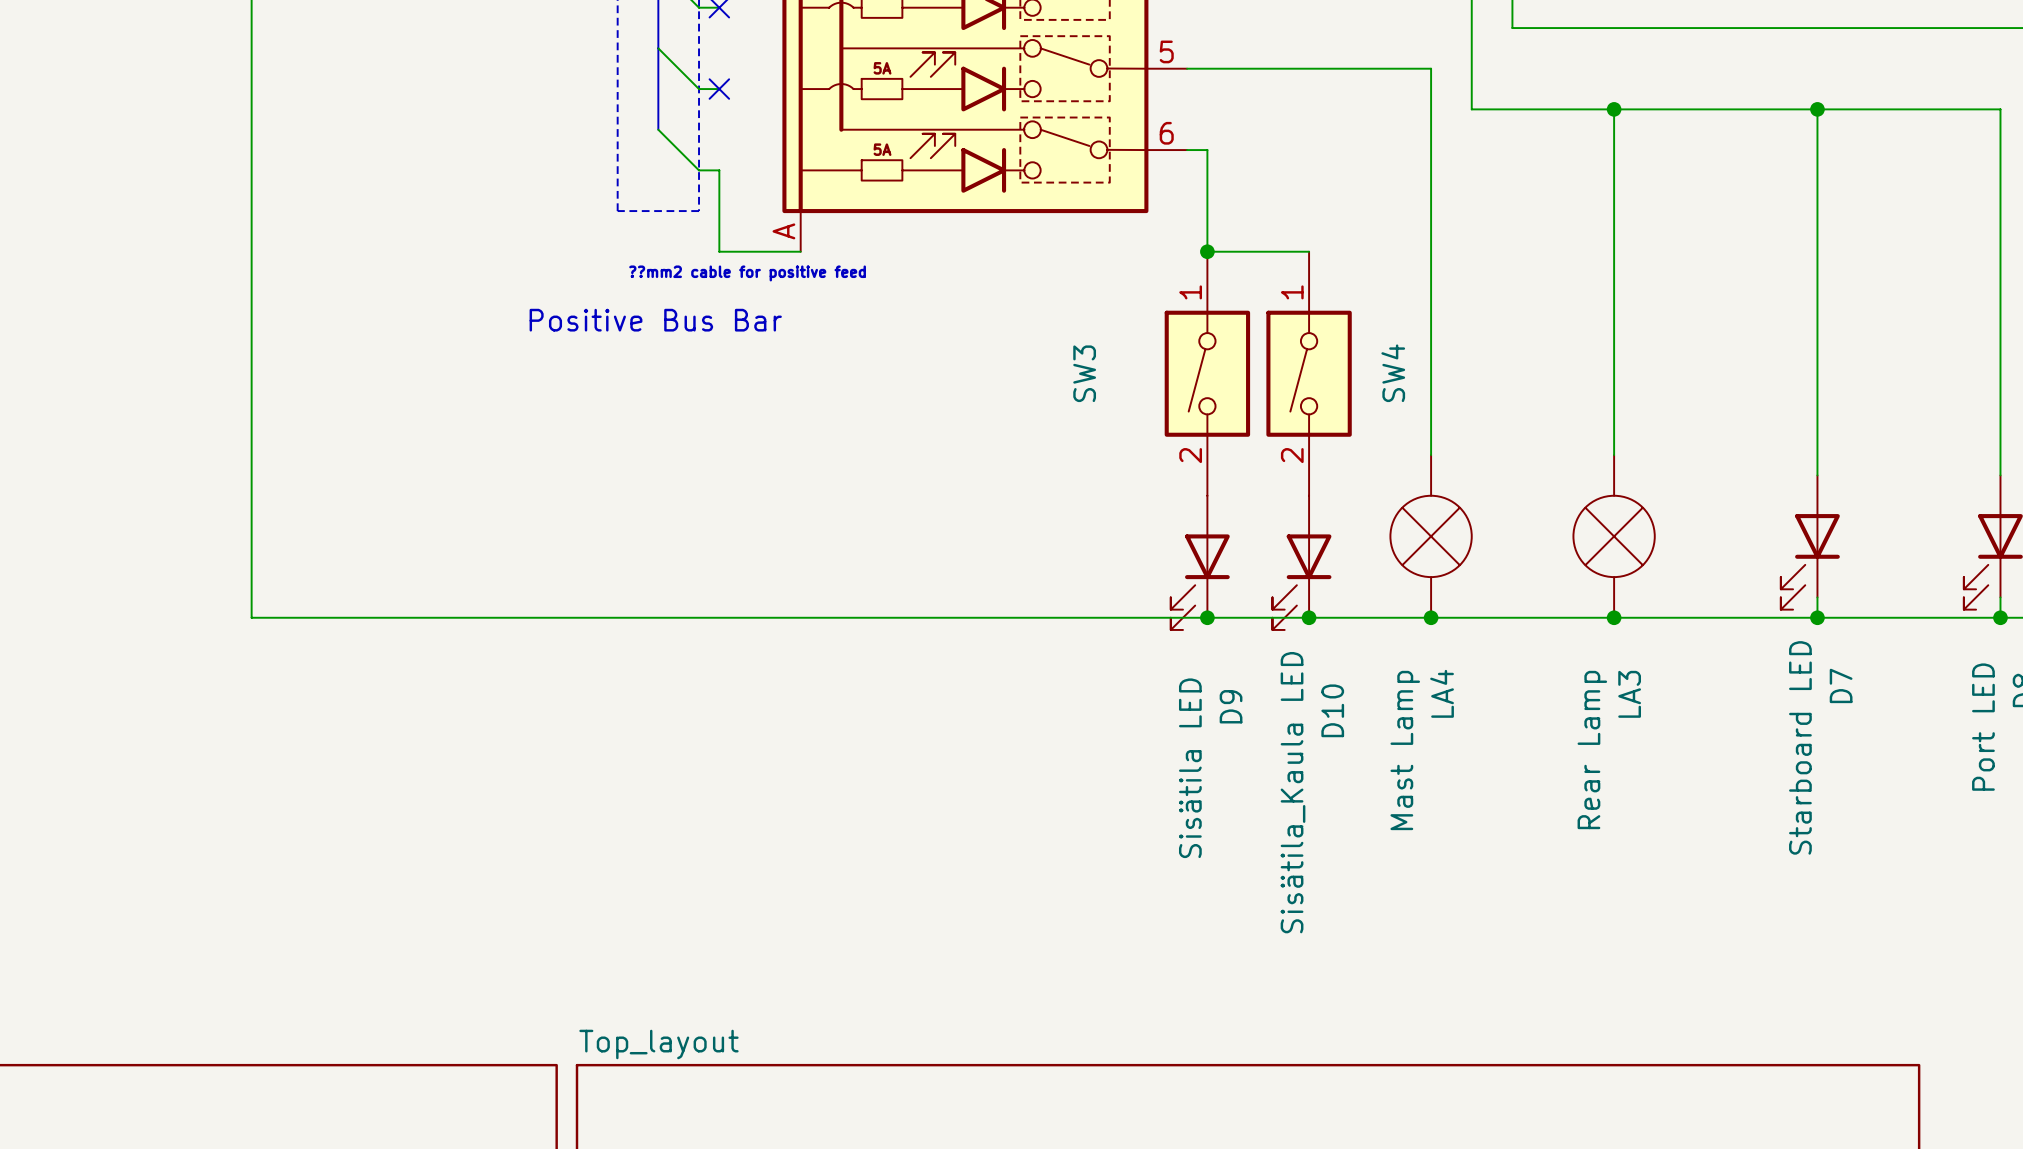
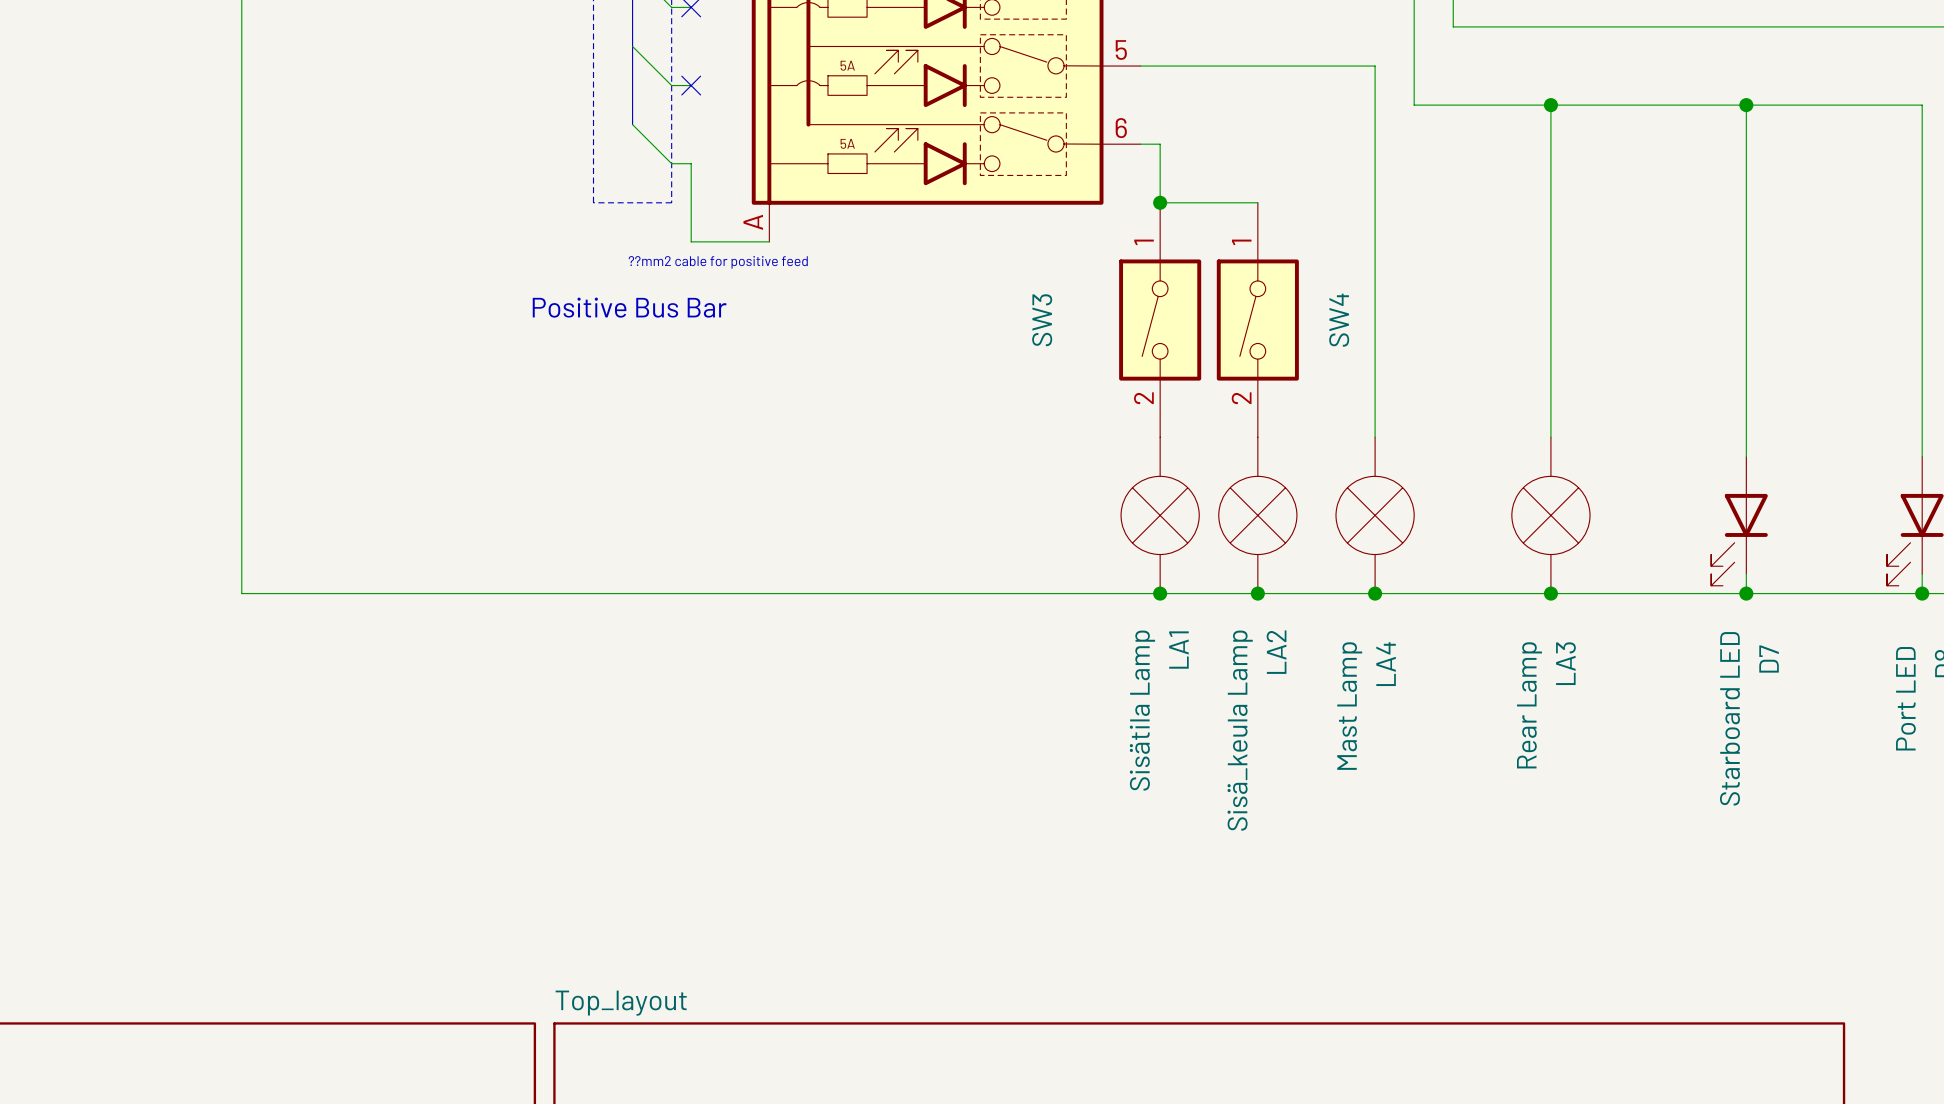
wire: (1207, 211) (1207, 251) (1309, 251) -> (1160, 202) (1257, 202)
junction position: (1207, 251) -> (1160, 202)
SW3 position: (1207, 373) -> (1160, 320)
SW4 position: (1309, 373) -> (1257, 320)
LA1: none -> Sisätila Lamp (1160, 515)
LA2: none -> Sisä_keula Lamp (1257, 515)
D9: Sisätila LED (1200, 562) -> none
D10: Sisätila_Kaula LED (1301, 562) -> none

